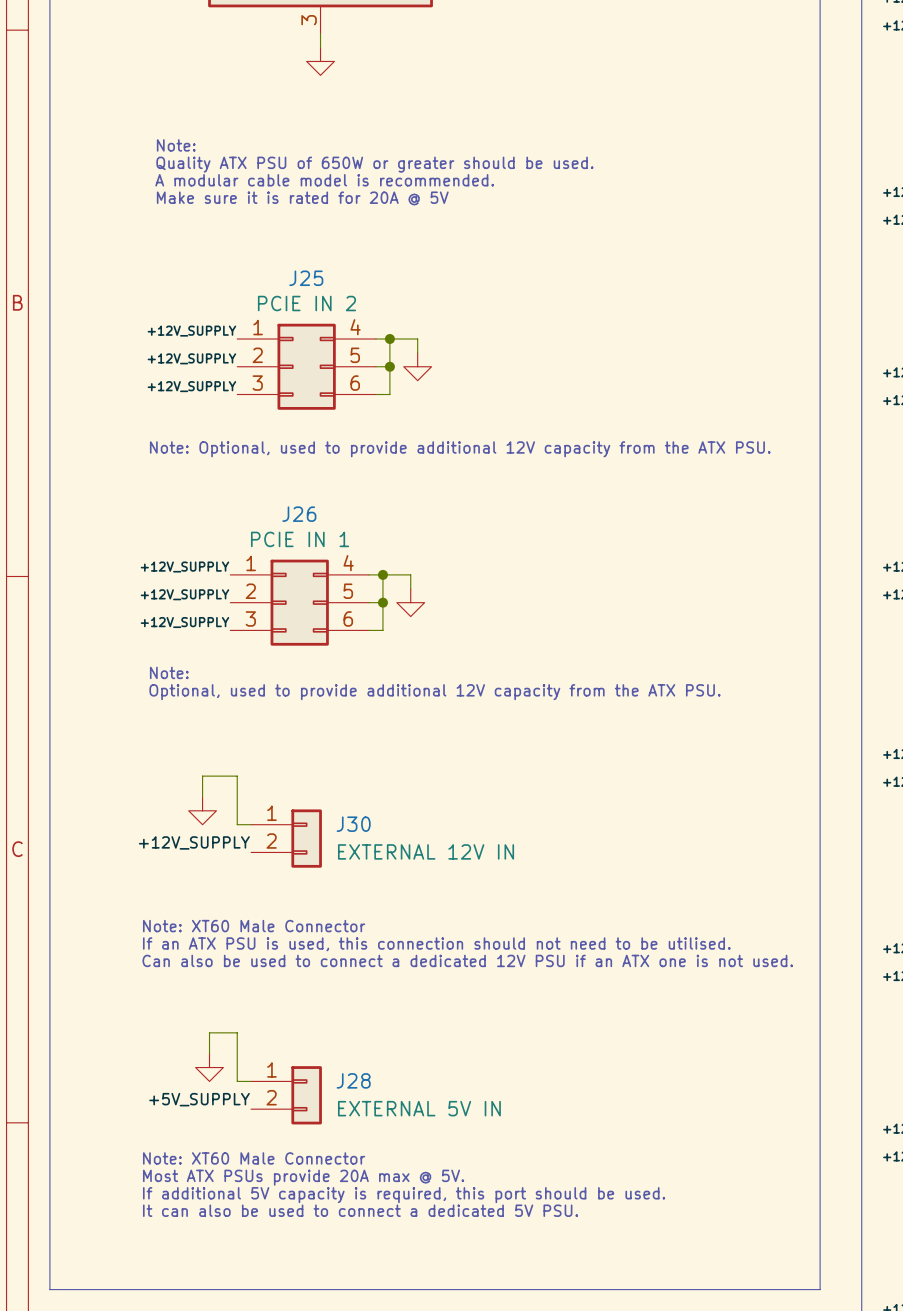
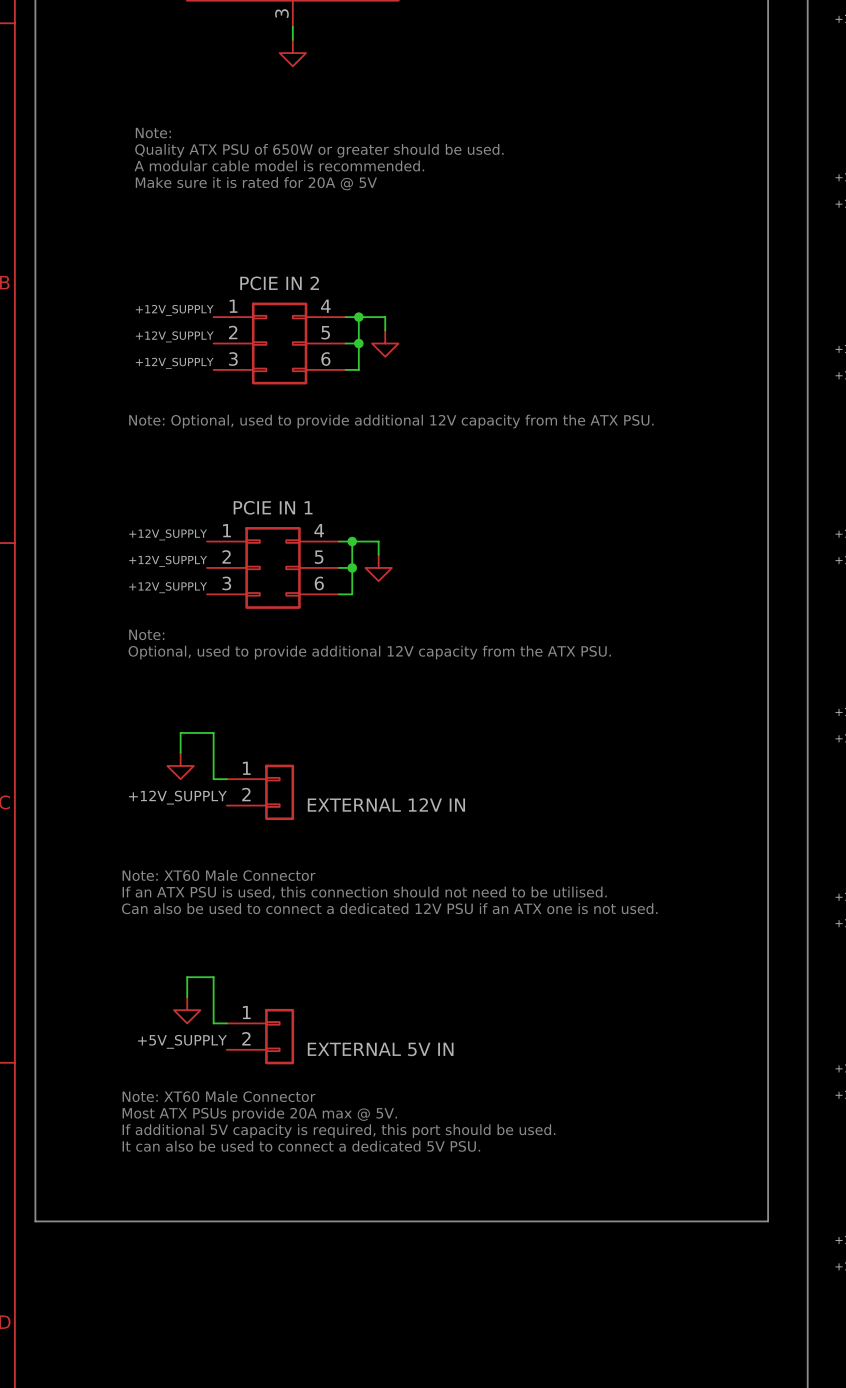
J25 name: J25 (306, 278) -> none
J26 name: J26 (299, 514) -> none
J30 name: J30 (353, 824) -> none
J28 name: J28 (353, 1080) -> none

